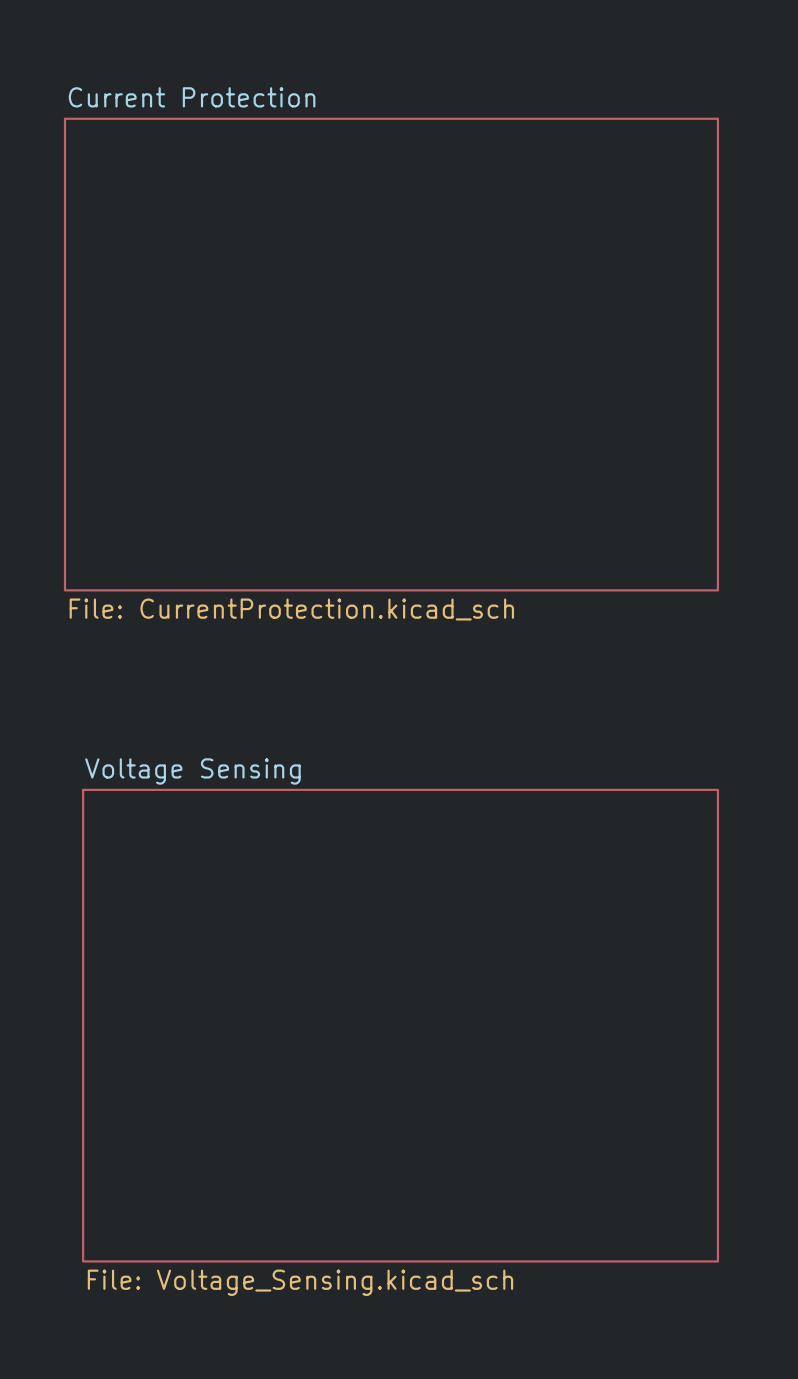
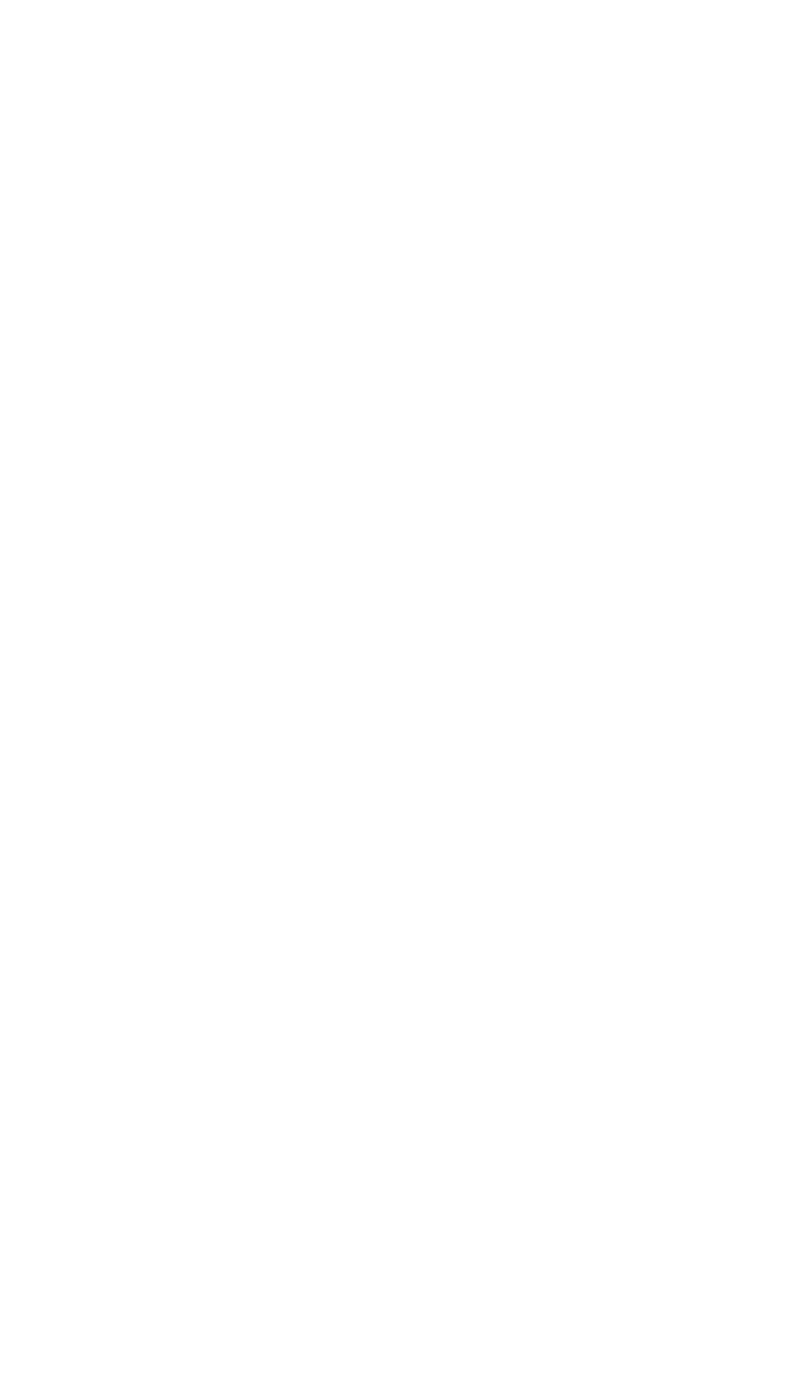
sheet Current Protection: File: CurrentProtection.kicad_sch (391, 354) -> none
sheet Voltage Sensing: File: Voltage_Sensing.kicad_sch (400, 1025) -> none

